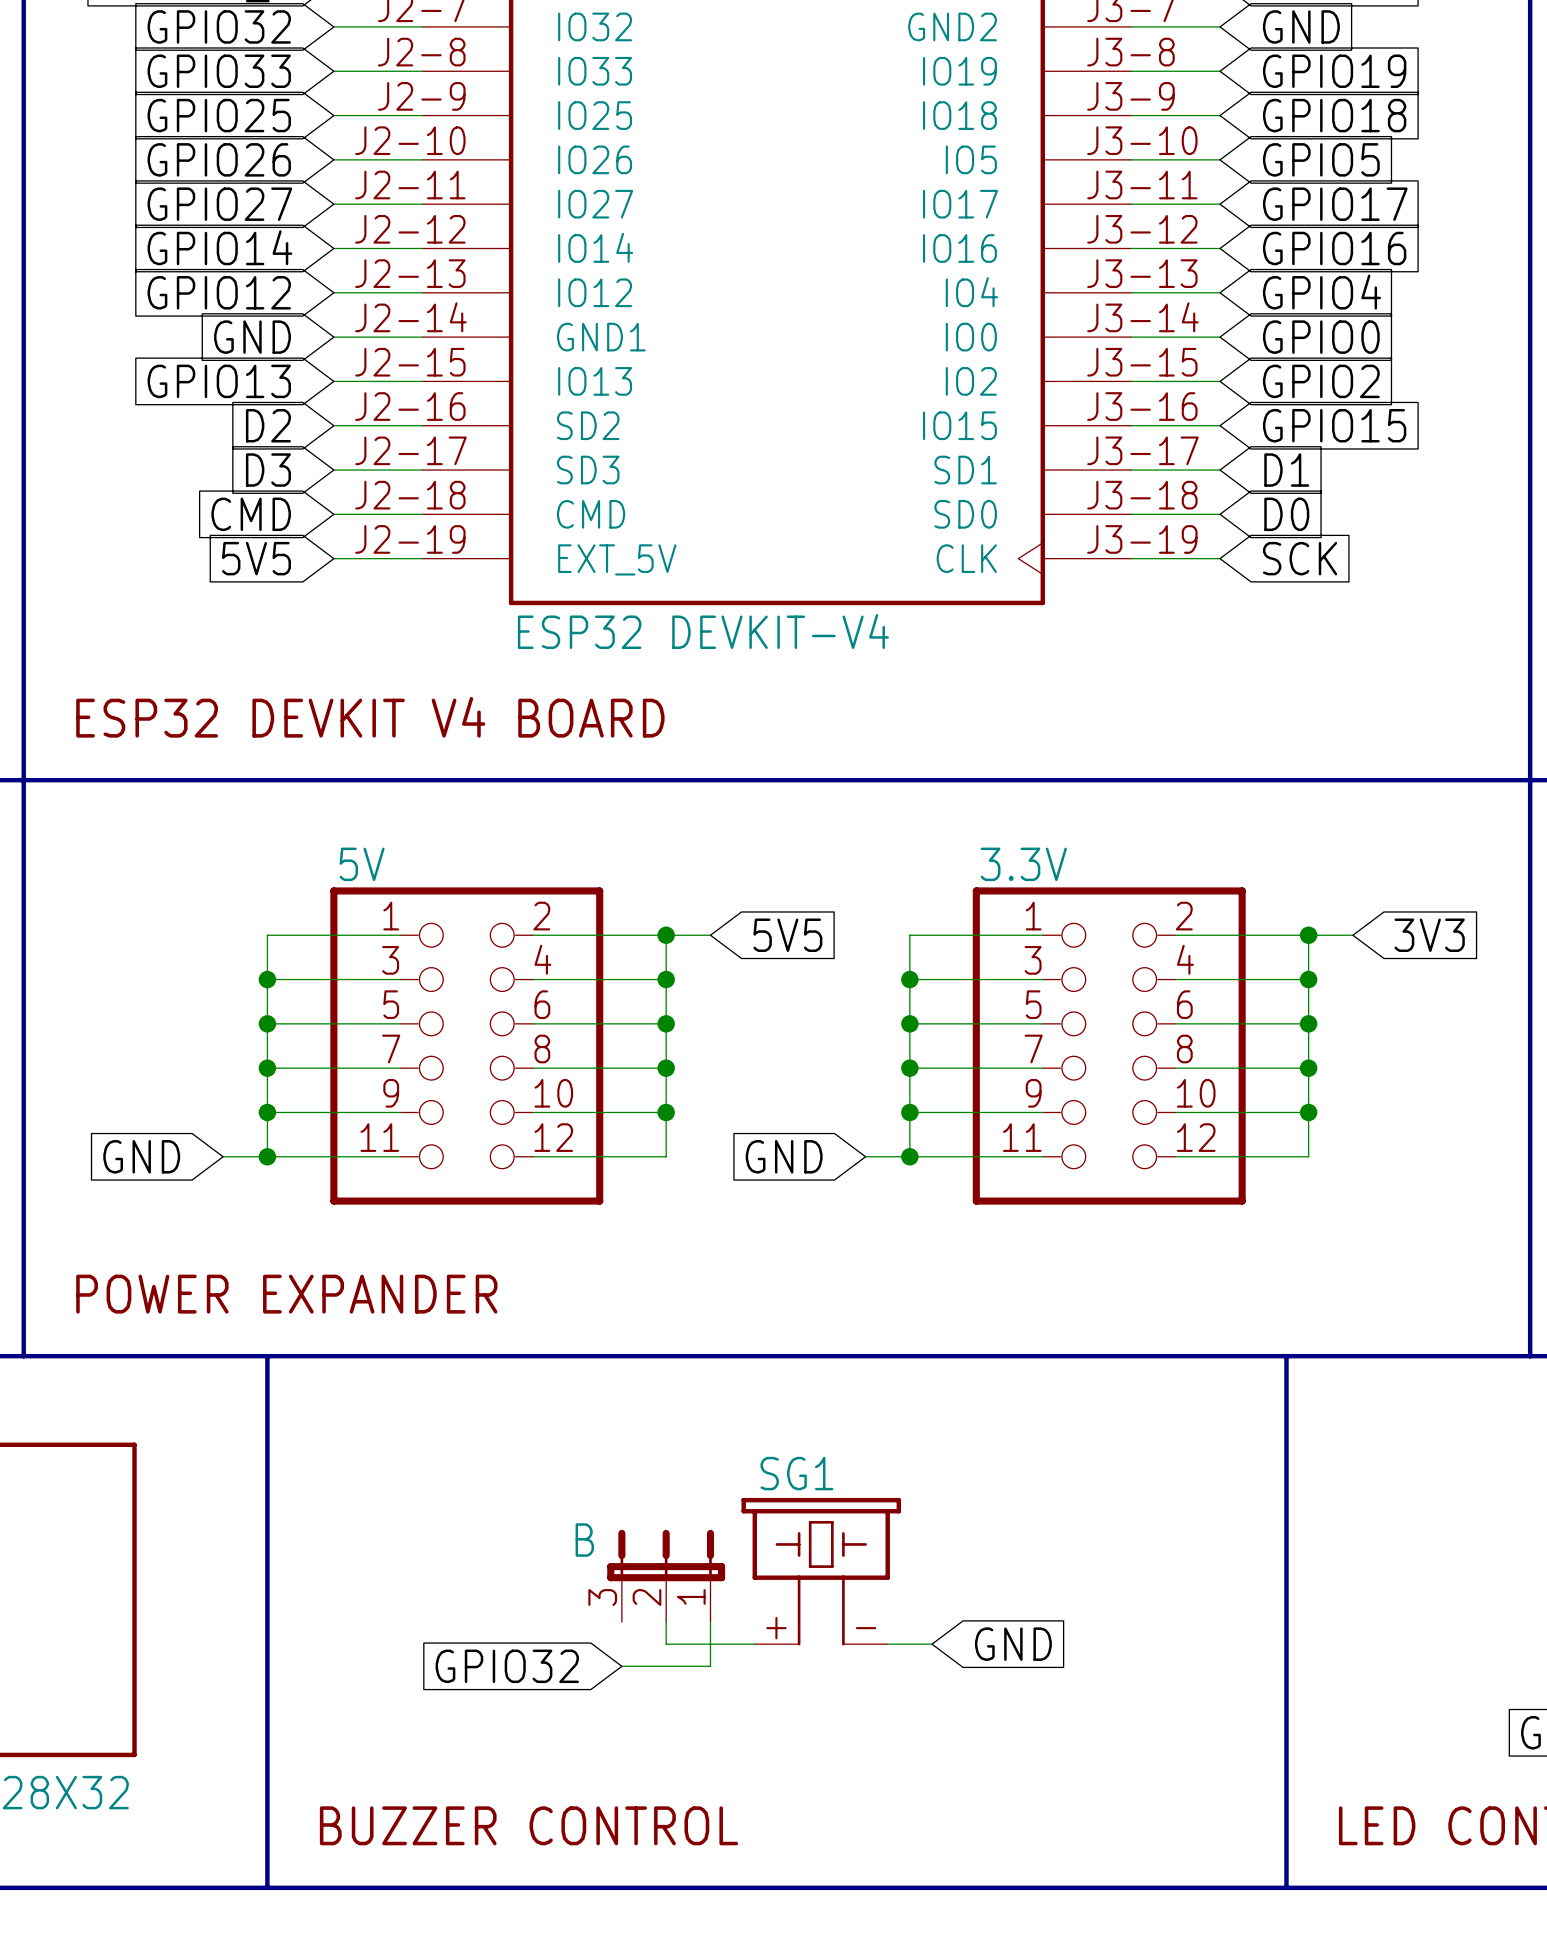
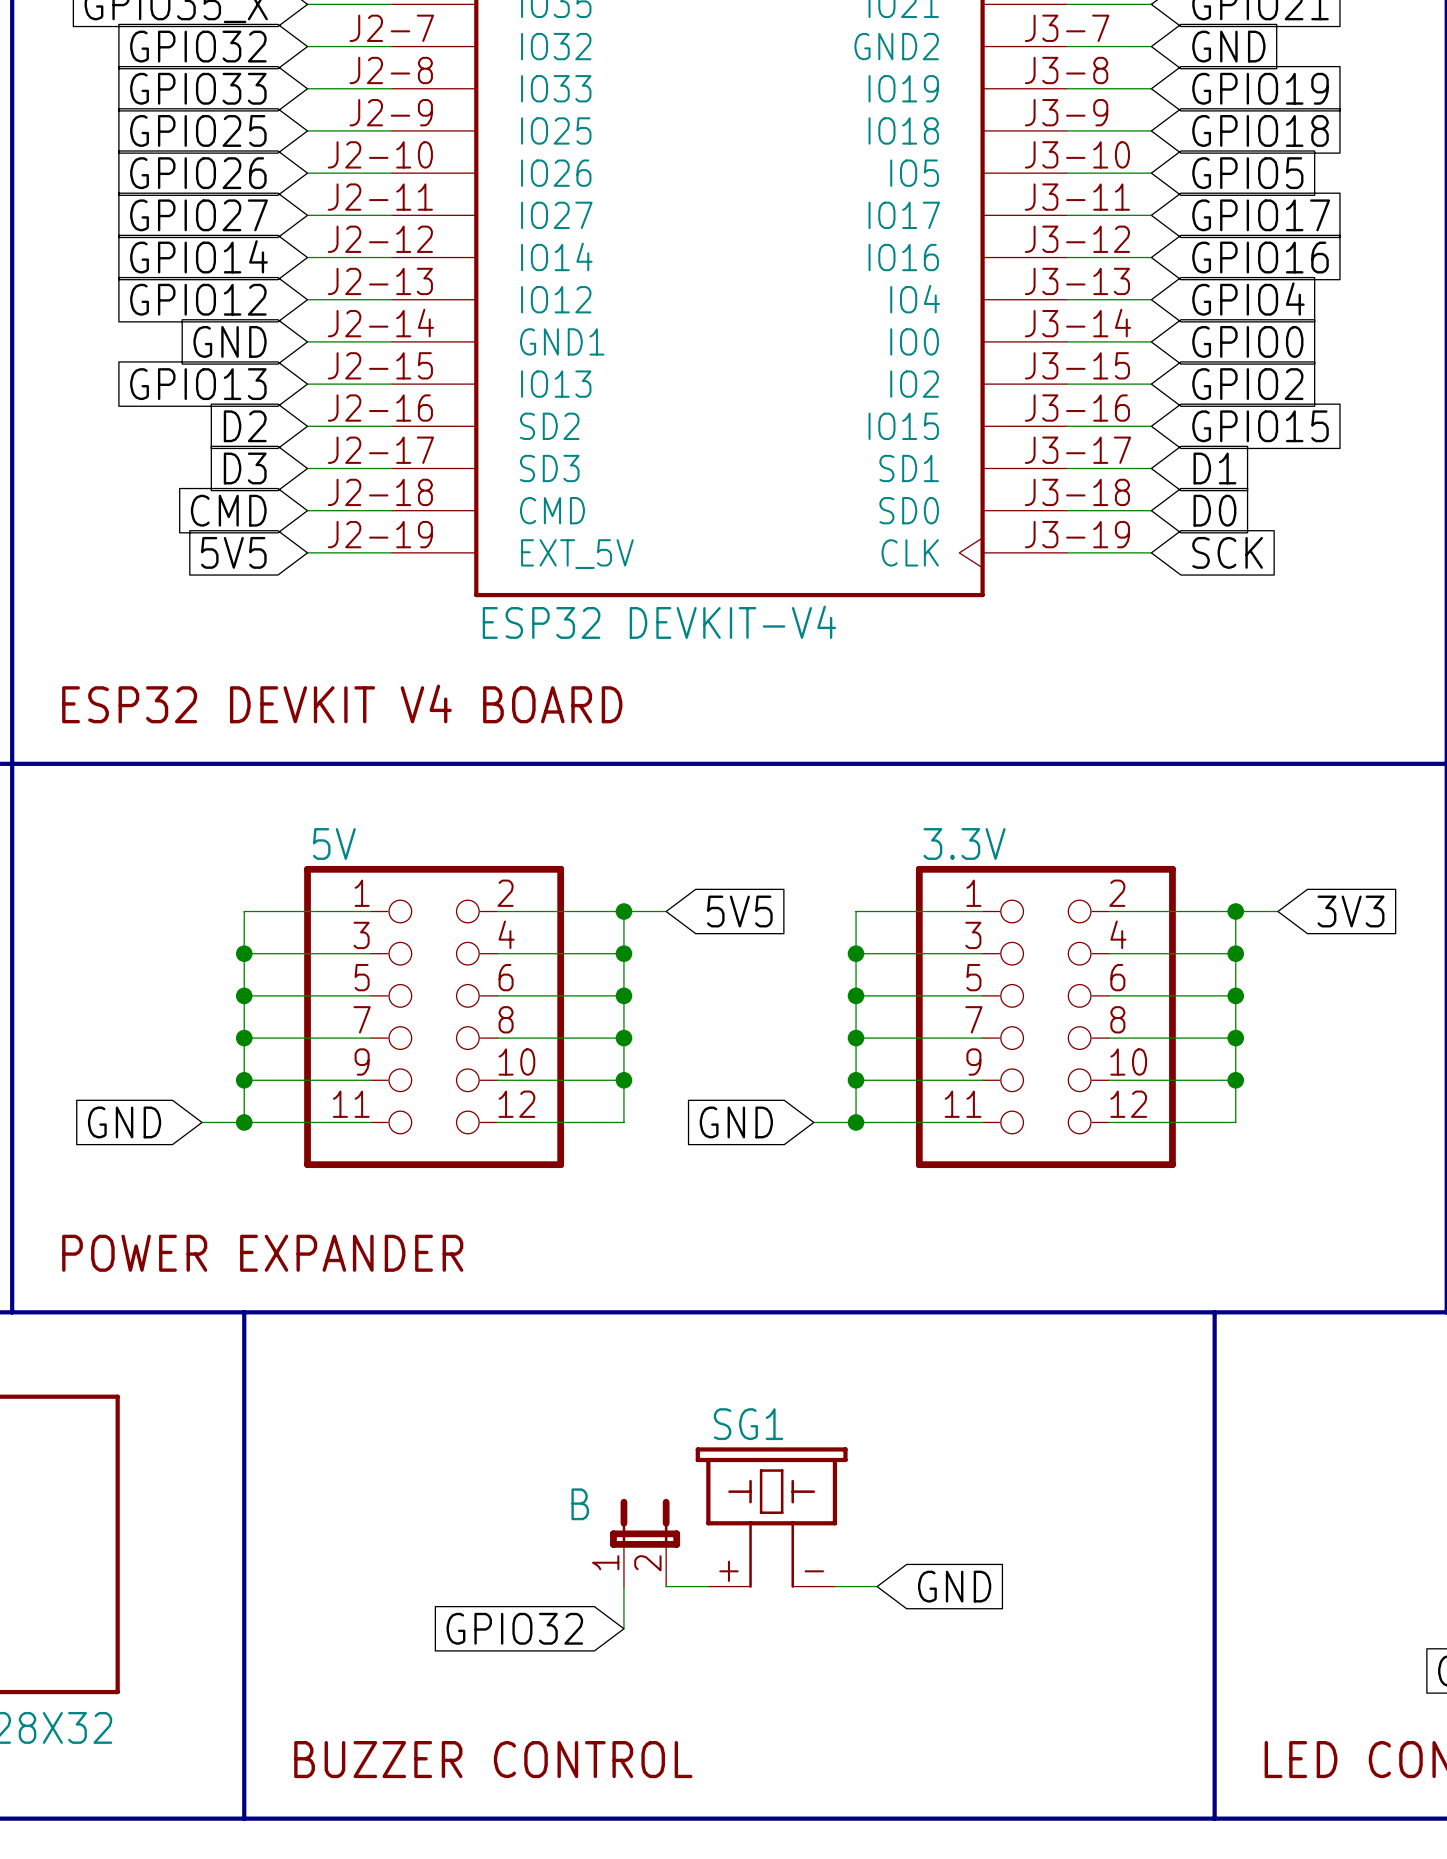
B: (666, 1575) -> none
B: none -> (645, 1542)
wire: (666, 1622) (666, 1644) (710, 1644) -> none
wire: (710, 1622) (710, 1666) (621, 1666) -> none
wire: none -> (623, 1586) (623, 1628)
global label position: GPIO32 (507, 1666) -> GPIO32 (514, 1628)

